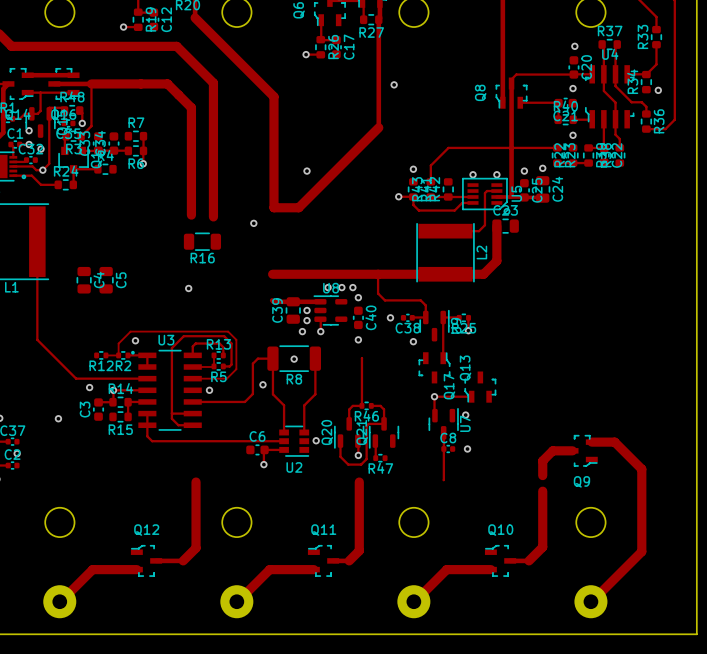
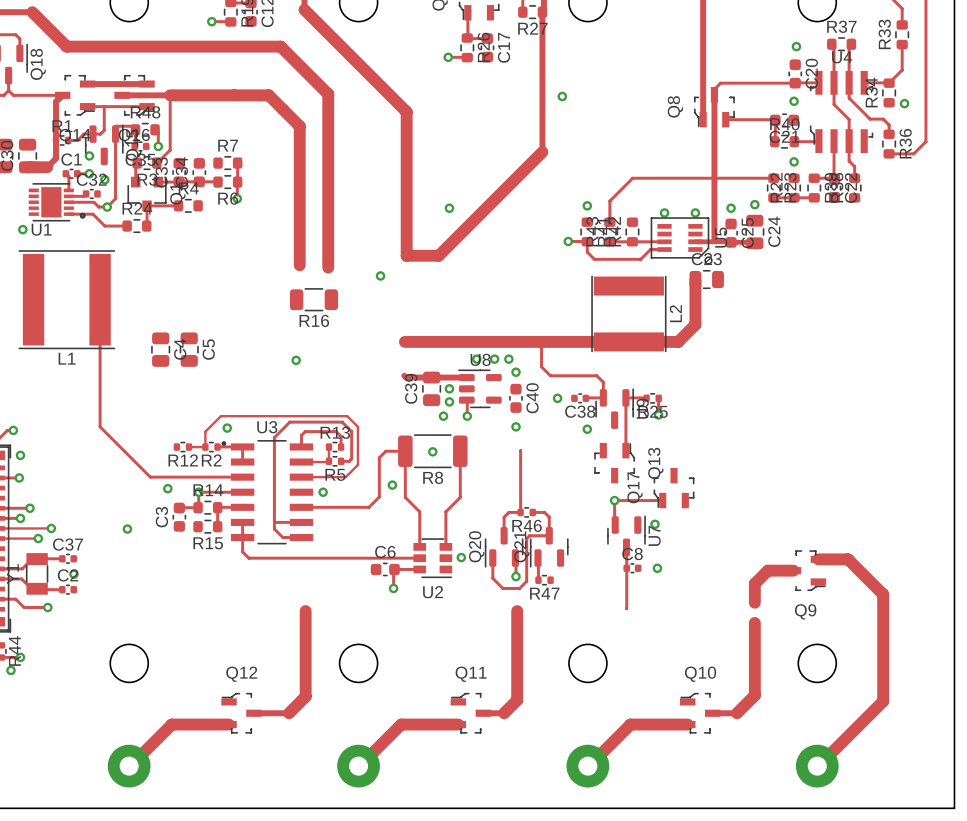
top track: (496, 191) (487, 191) (484, 193) (484, 225) (478, 231) (445, 231) -> none

